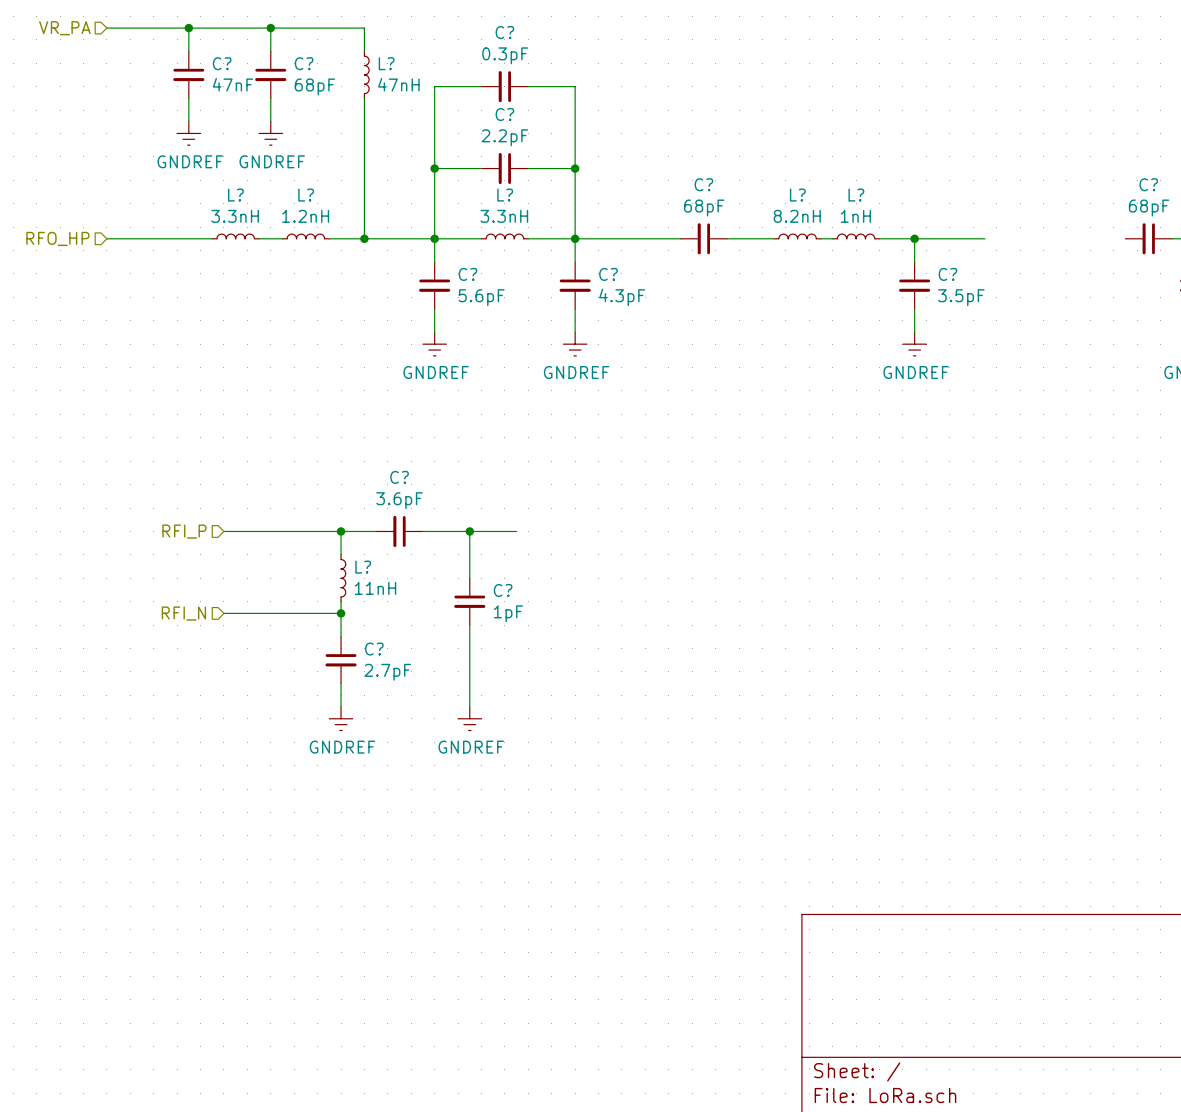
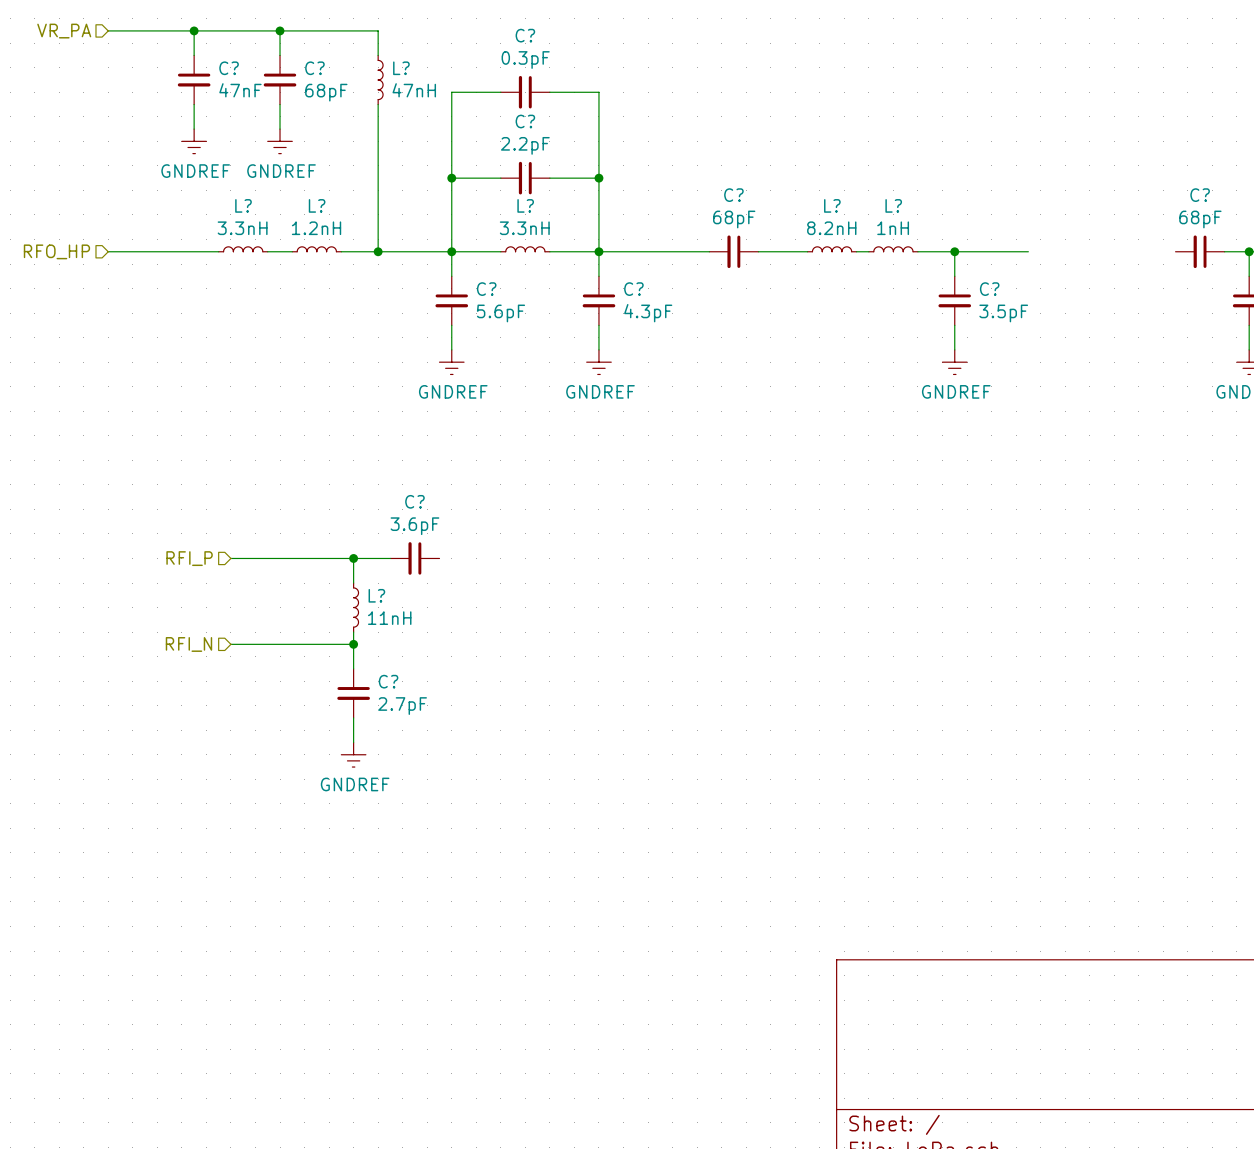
wire: (422, 531) (516, 531) -> none
wire: (469, 531) (469, 578) -> none
junction: (469, 531) -> none
C?: 1pF (469, 601) -> none
wire: (469, 625) (469, 707) -> none
power symbol: GNDREF (469, 718) -> none

